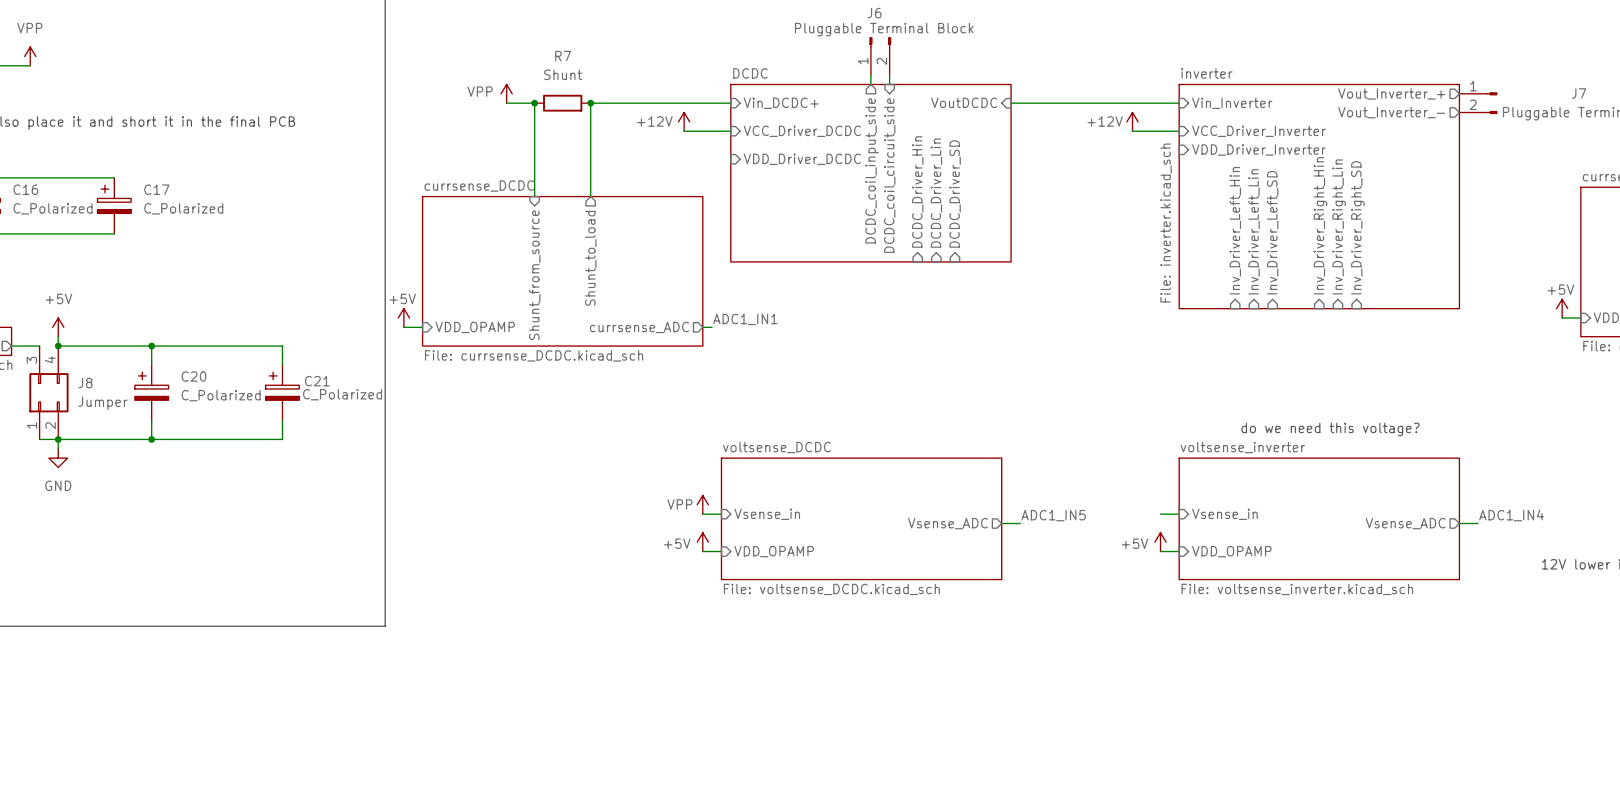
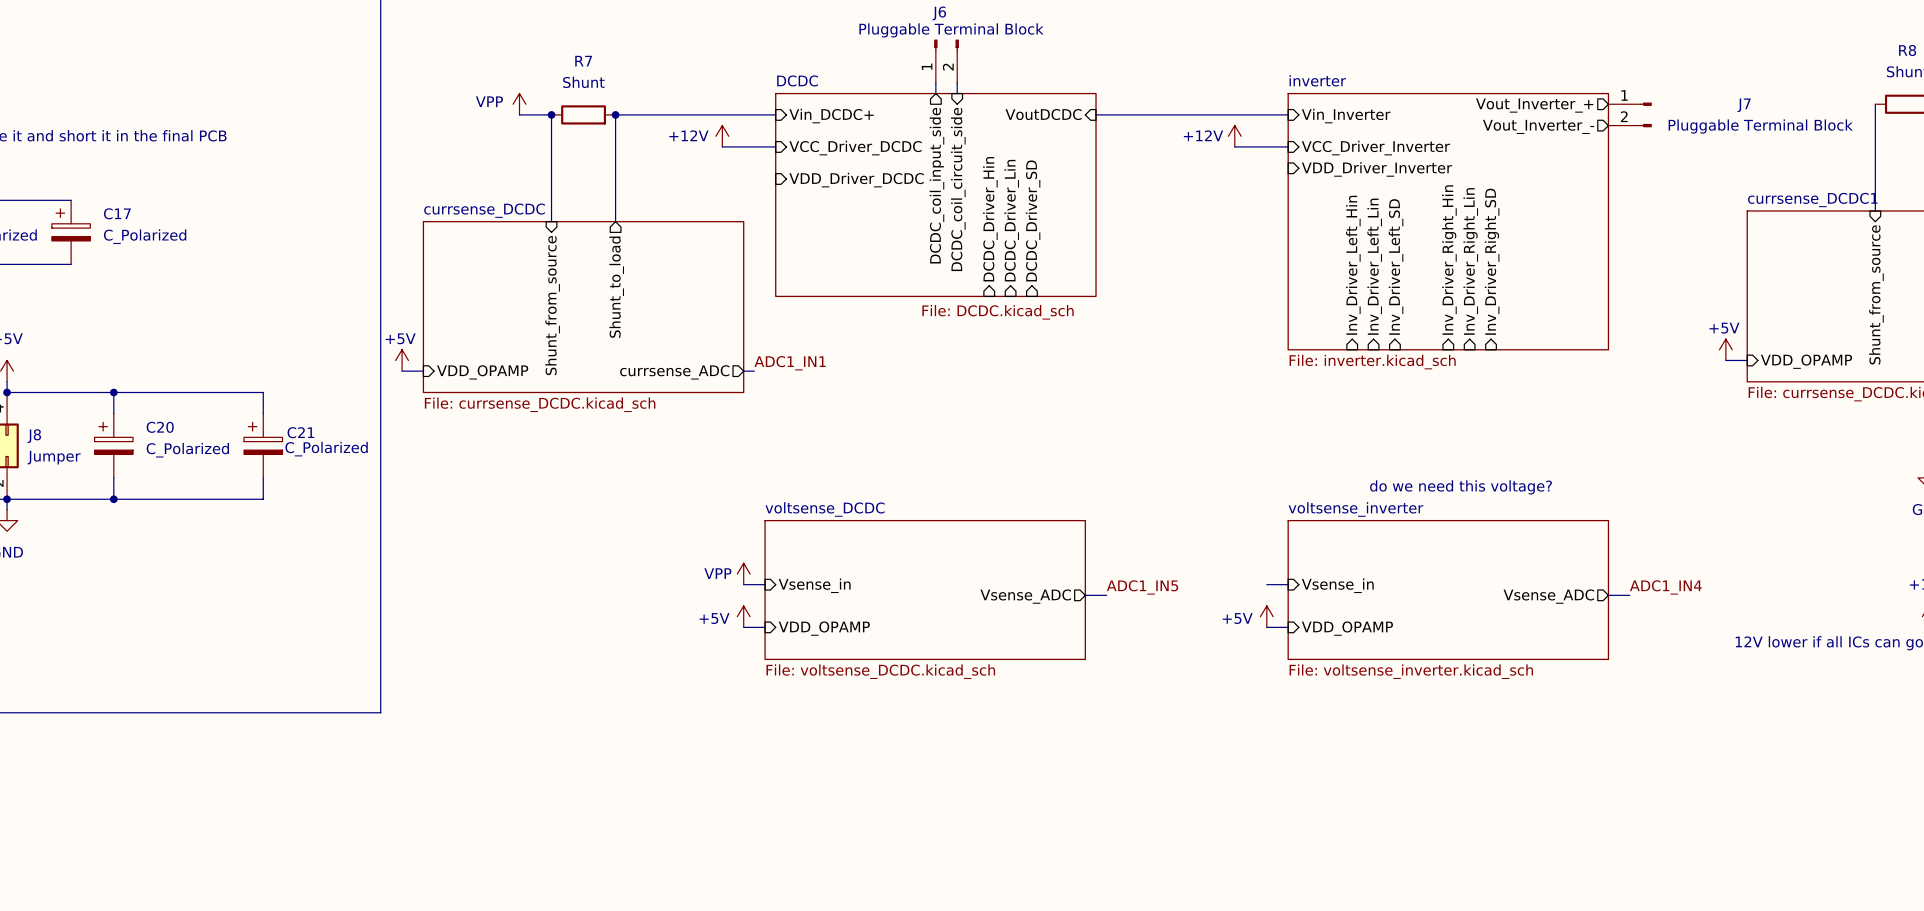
sheet inverter value rotation: 0° (1166, 223) -> 90° clockwise (1372, 362)
sheet DCDC value: none -> File: DCDC.kicad_sch (997, 312)

